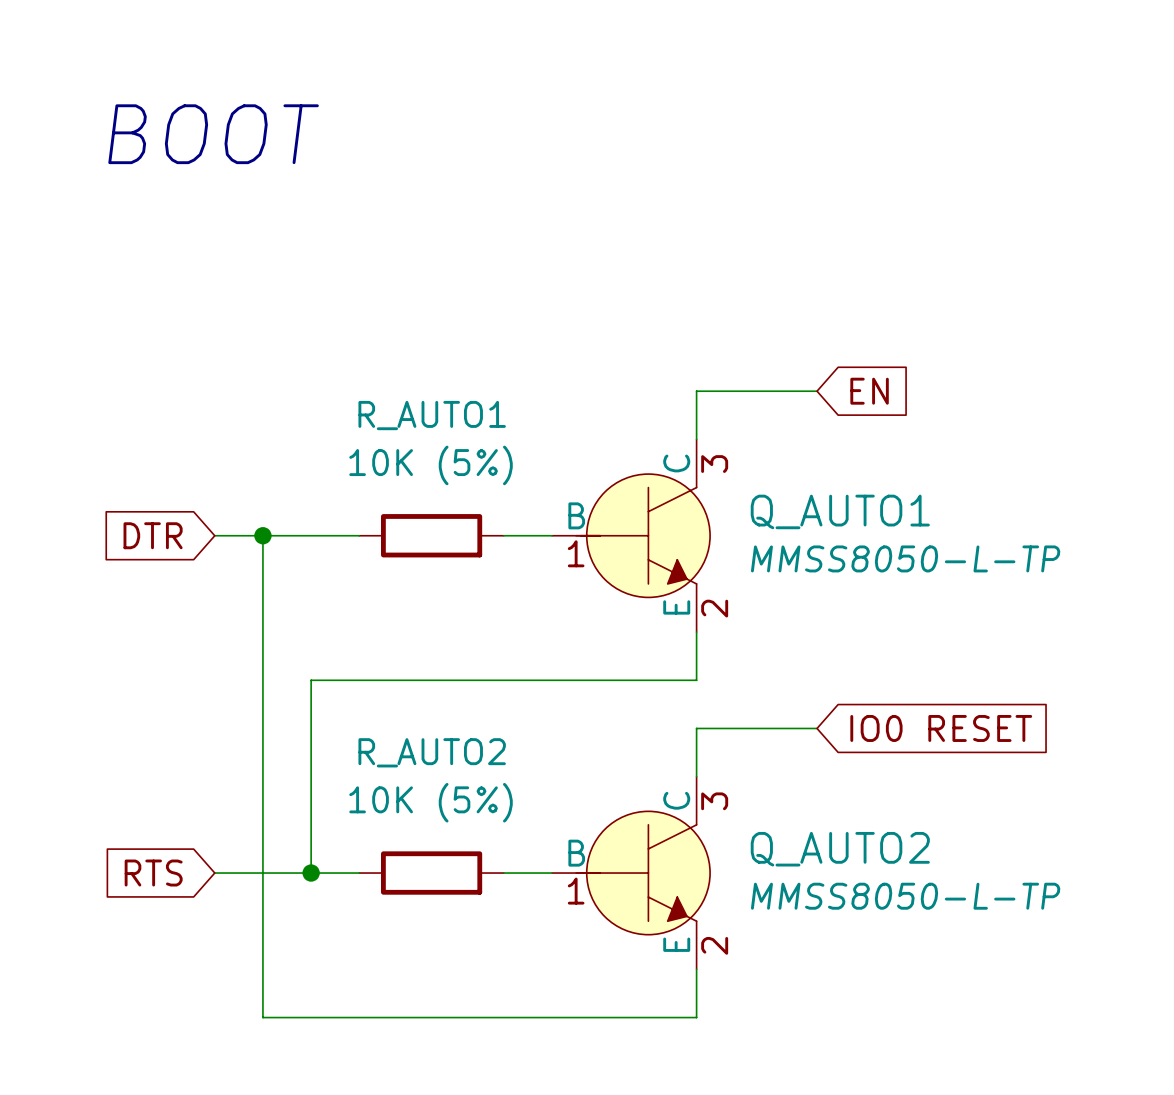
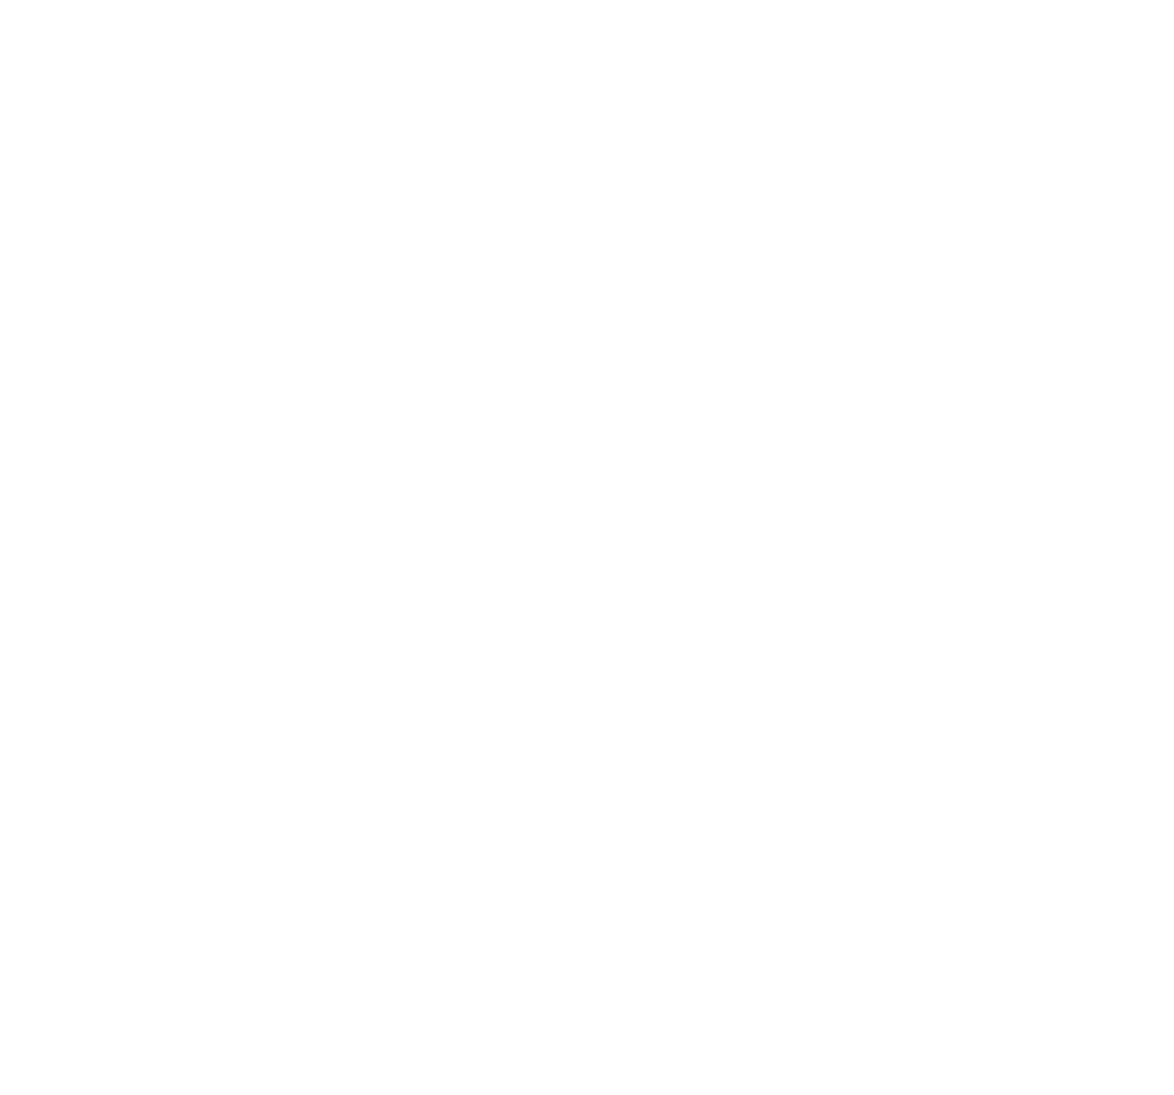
text: BOOT (213, 134) -> none
wire: (817, 391) (696, 391) (696, 439) -> none
global label: EN (869, 391) -> none
global label: DTR (153, 535) -> none
wire: (214, 535) (359, 535) -> none
wire: (262, 535) (262, 1017) (696, 1017) (696, 969) -> none
junction: (262, 535) -> none
R_AUTO1: 10K (5%) (431, 535) -> none
wire: (503, 535) (552, 535) -> none
Q_AUTO1: (631, 535) -> none
wire: (696, 632) (696, 680) (311, 680) (311, 873) -> none
wire: (817, 728) (696, 728) (696, 776) -> none
global label: IO0 RESET (941, 728) -> none
global label: RTS (153, 873) -> none
wire: (214, 873) (359, 873) -> none
junction: (311, 873) -> none
R_AUTO2: 10K (5%) (431, 873) -> none
wire: (503, 873) (552, 873) -> none
Q_AUTO2: (631, 873) -> none

